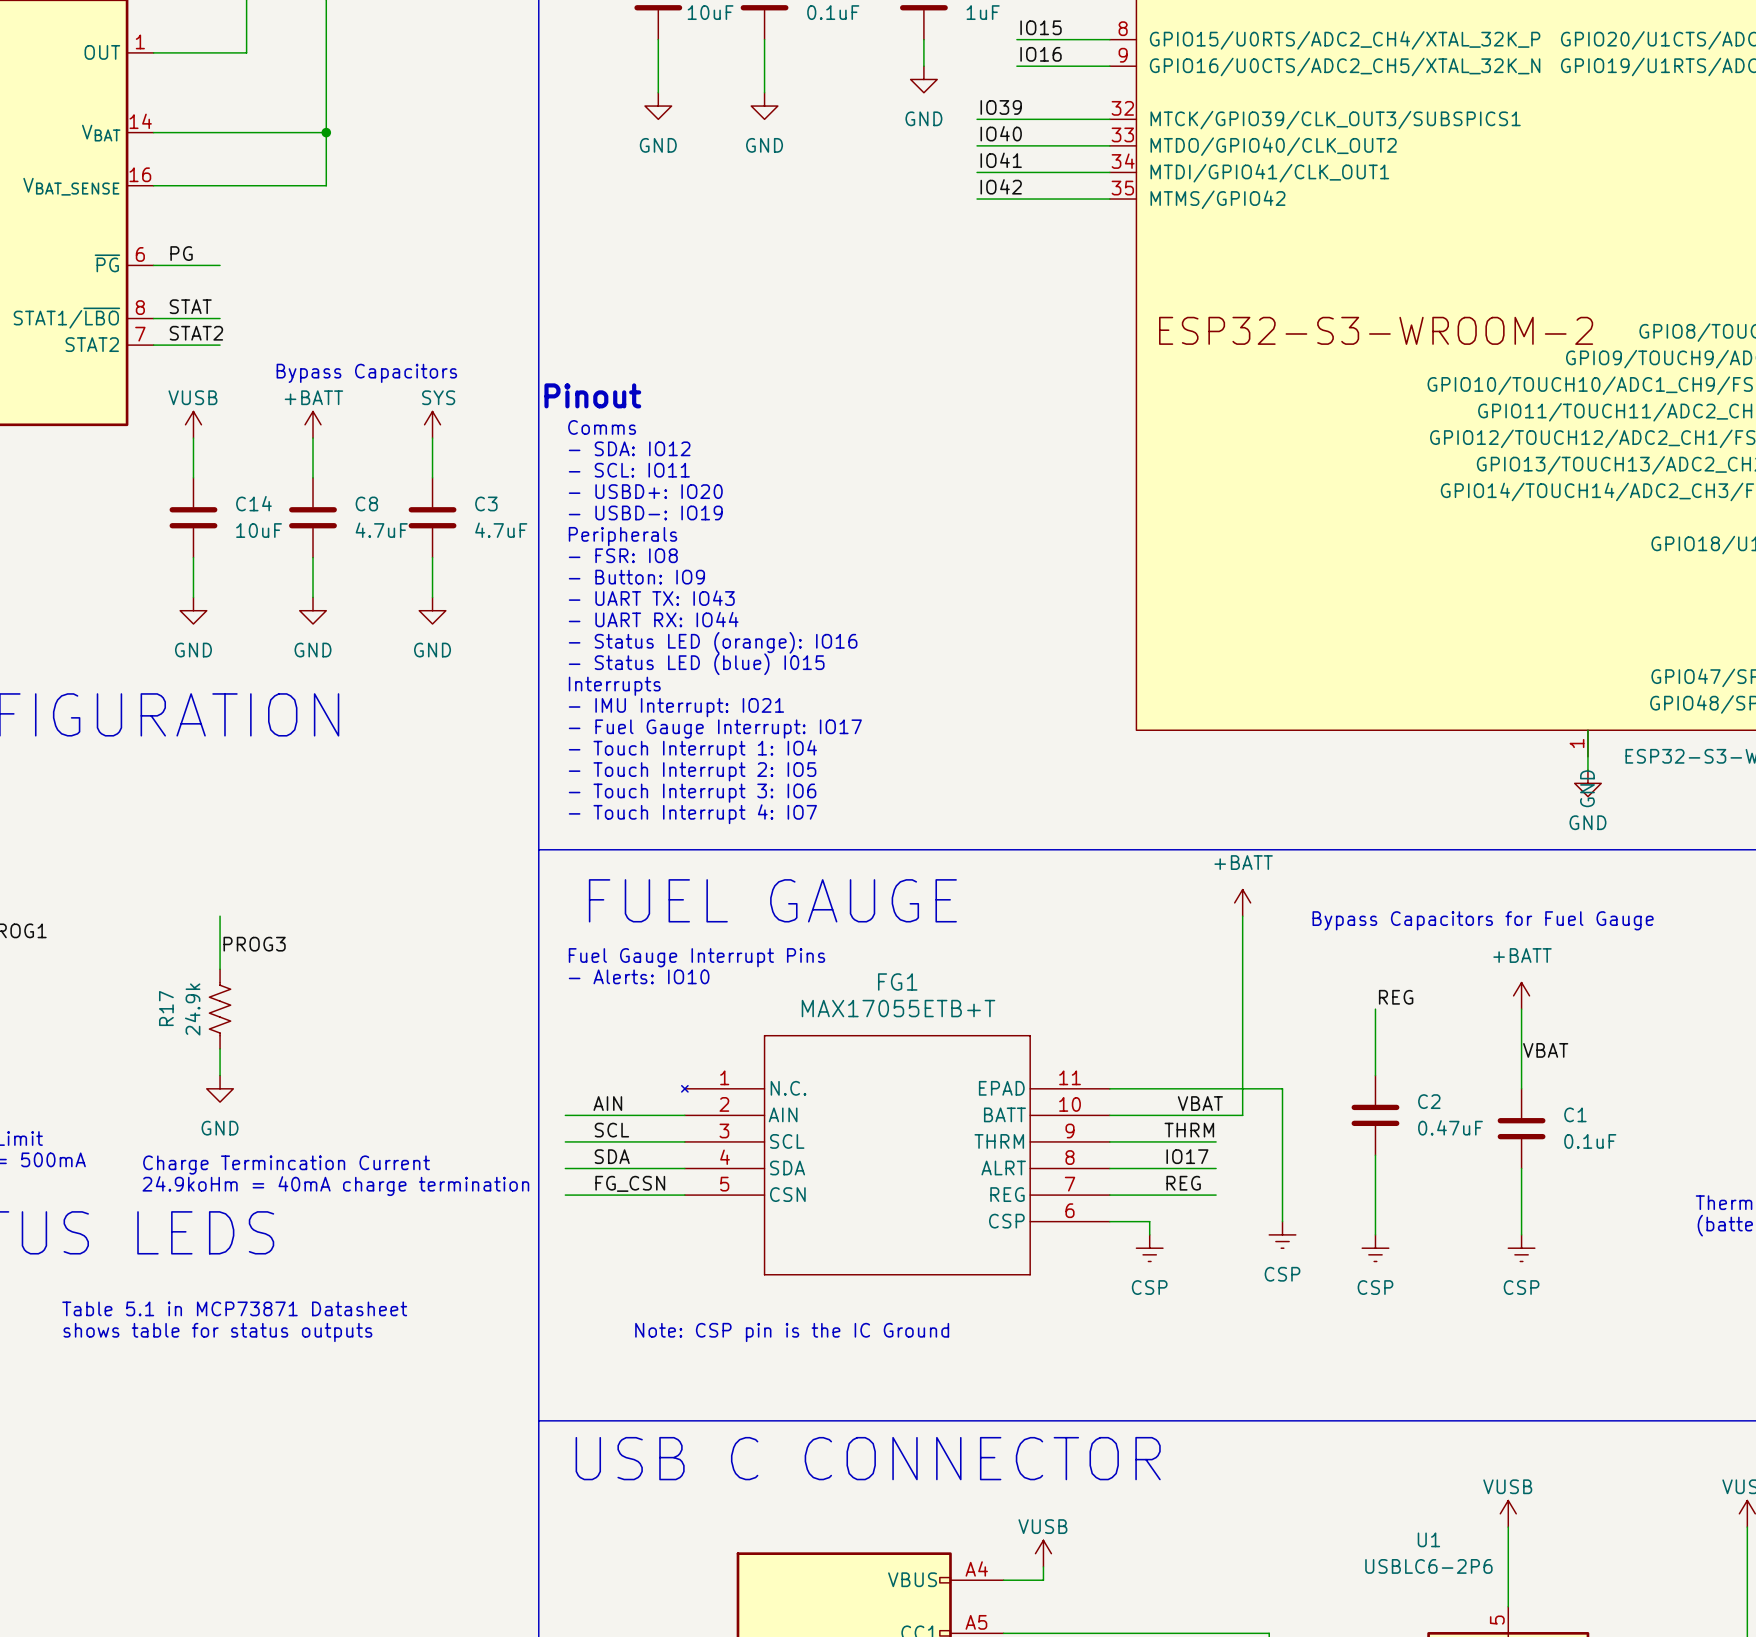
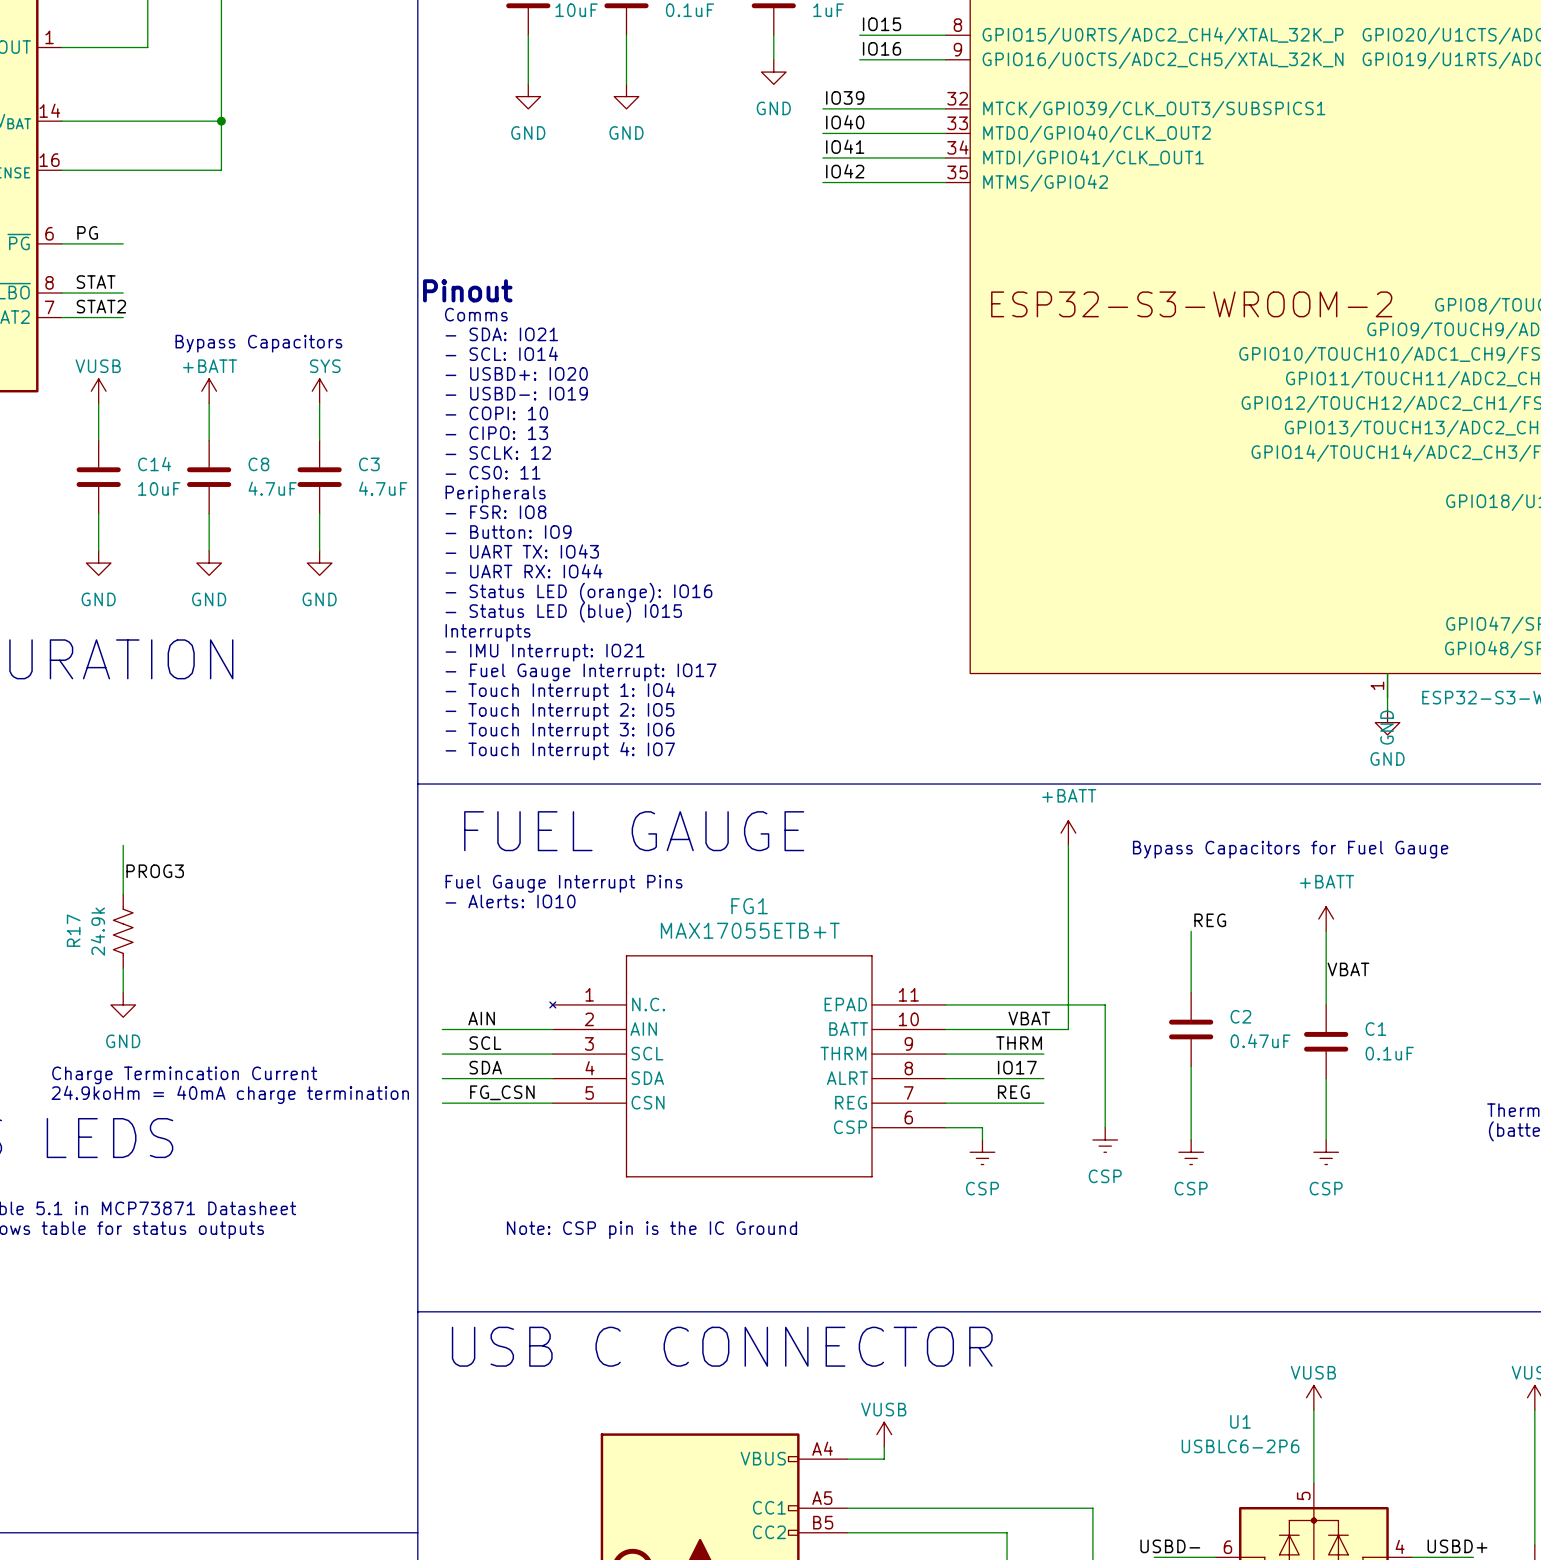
text: none -> Comms (476, 314)
text: none -> - SDA: IO21 (501, 334)
text: none -> - SCL: IO14 (501, 353)
text position: Pinout (592, 395) -> Pinout (467, 290)
text: none -> - USBD+: IO20 (516, 373)
text: Comms (602, 427) -> - USBD-: IO19 (516, 393)
text: - SDA: IO12 (629, 448) -> - COPI: 10 (496, 413)
text: - SCL: IO11 (629, 470) -> - CIPO: 13 (496, 433)
text: - USBD+: IO20 (645, 491) -> - SCLK: 12 (498, 452)
text: - USBD-: IO19 (645, 512) -> - CS0: 11 (493, 472)

